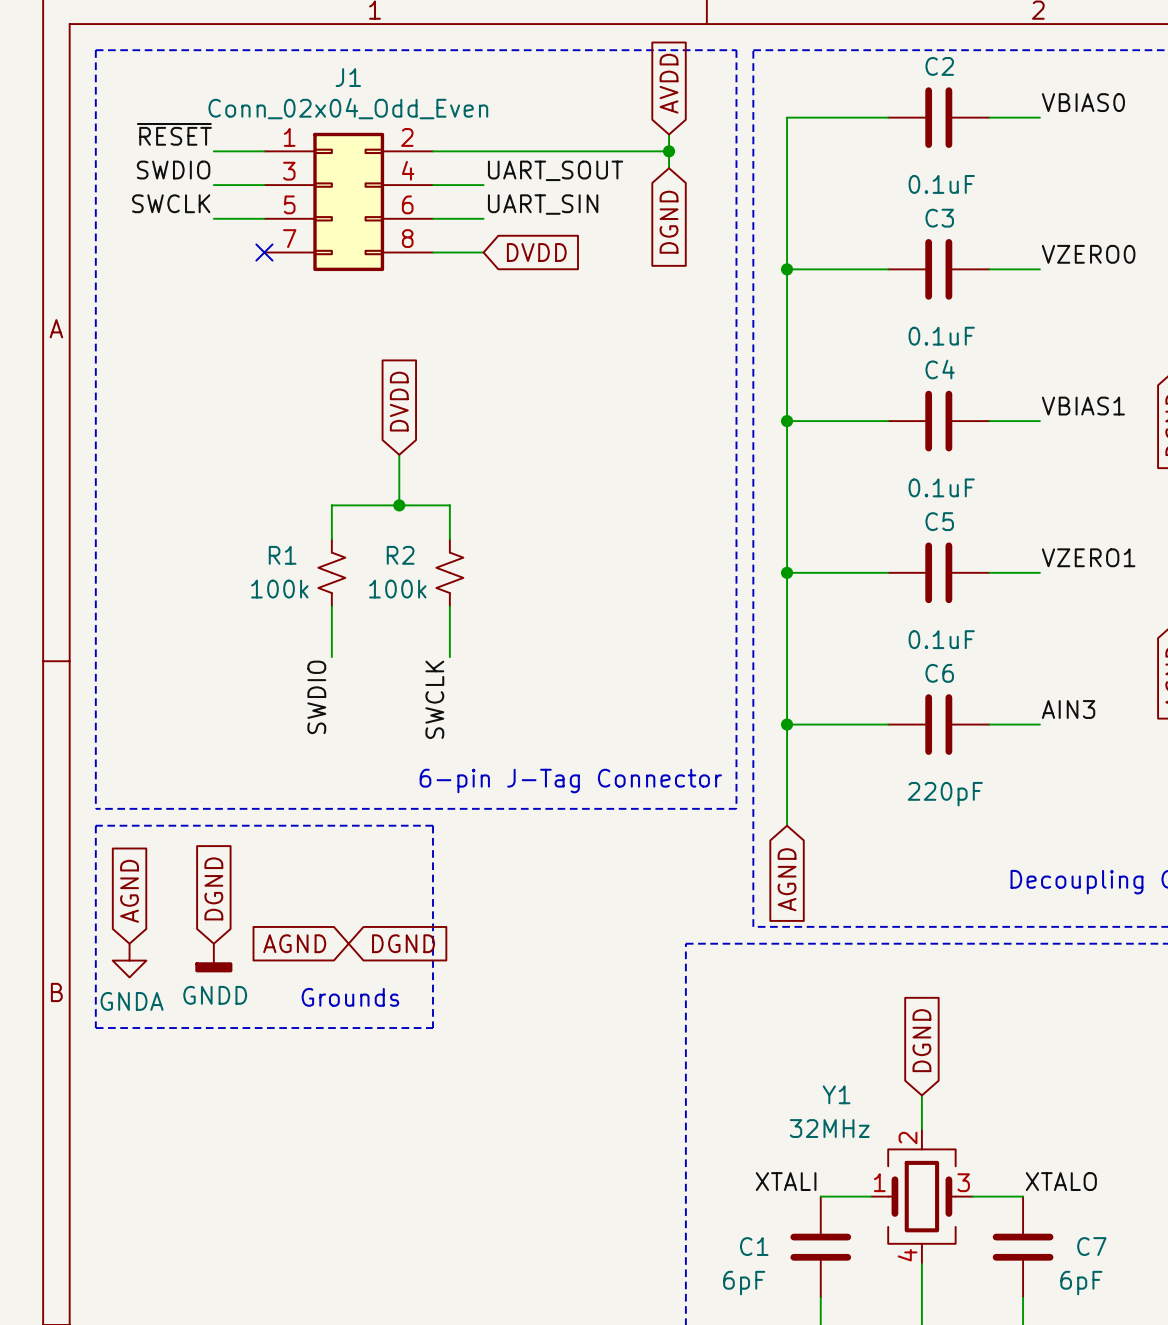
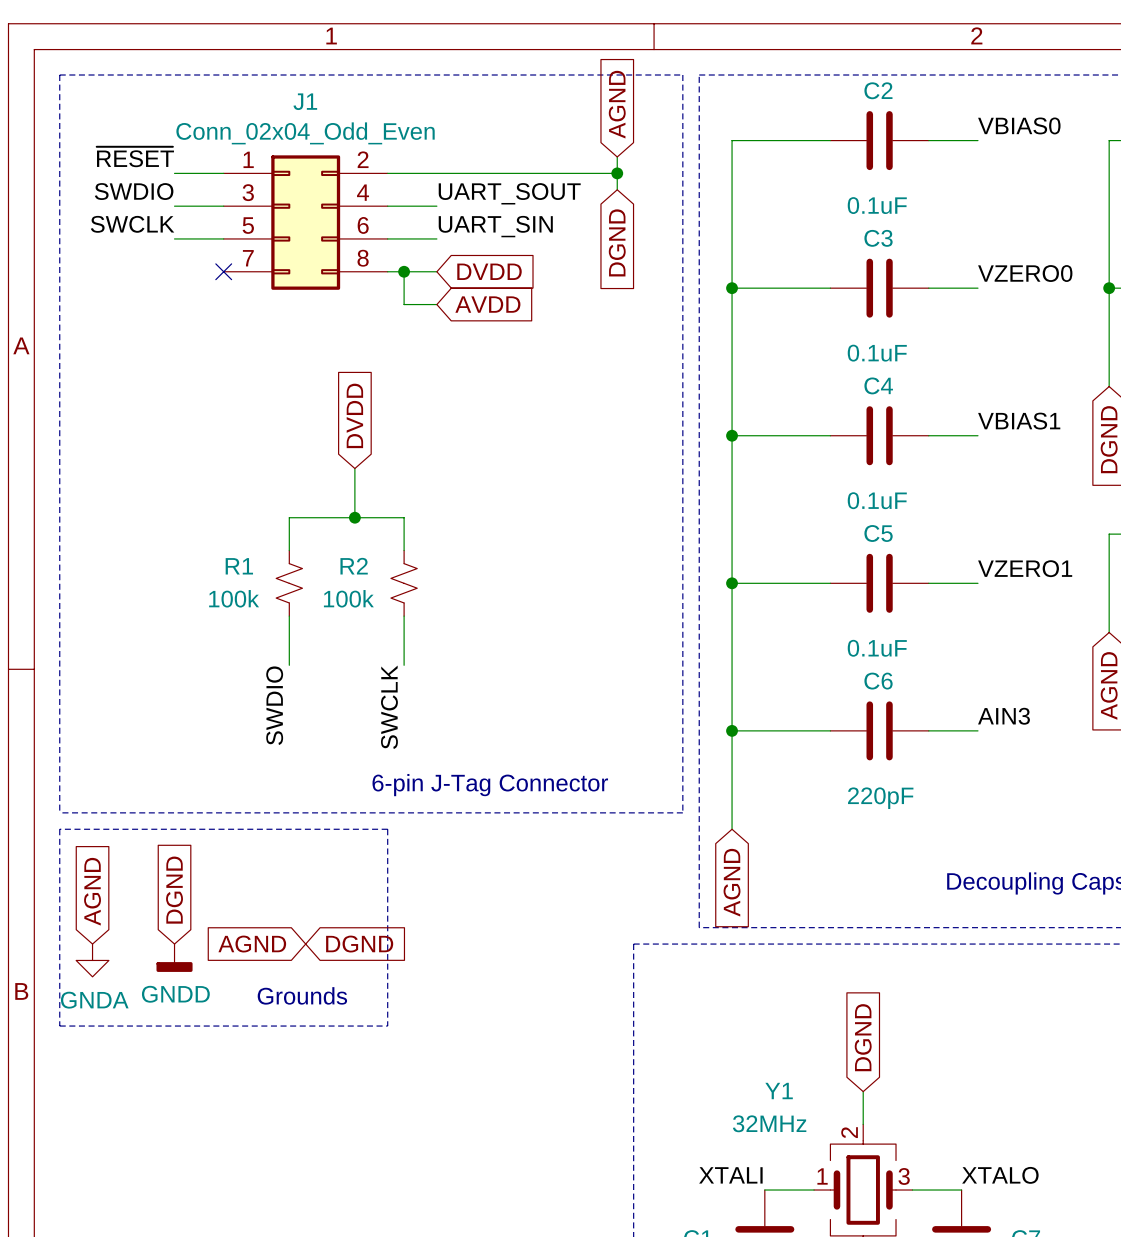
global label: AVDD (669, 83) -> AGND (617, 104)
wire: none -> (404, 271) (404, 304) (436, 304)
junction: none -> (404, 271)
global label: none -> AVDD (487, 304)

